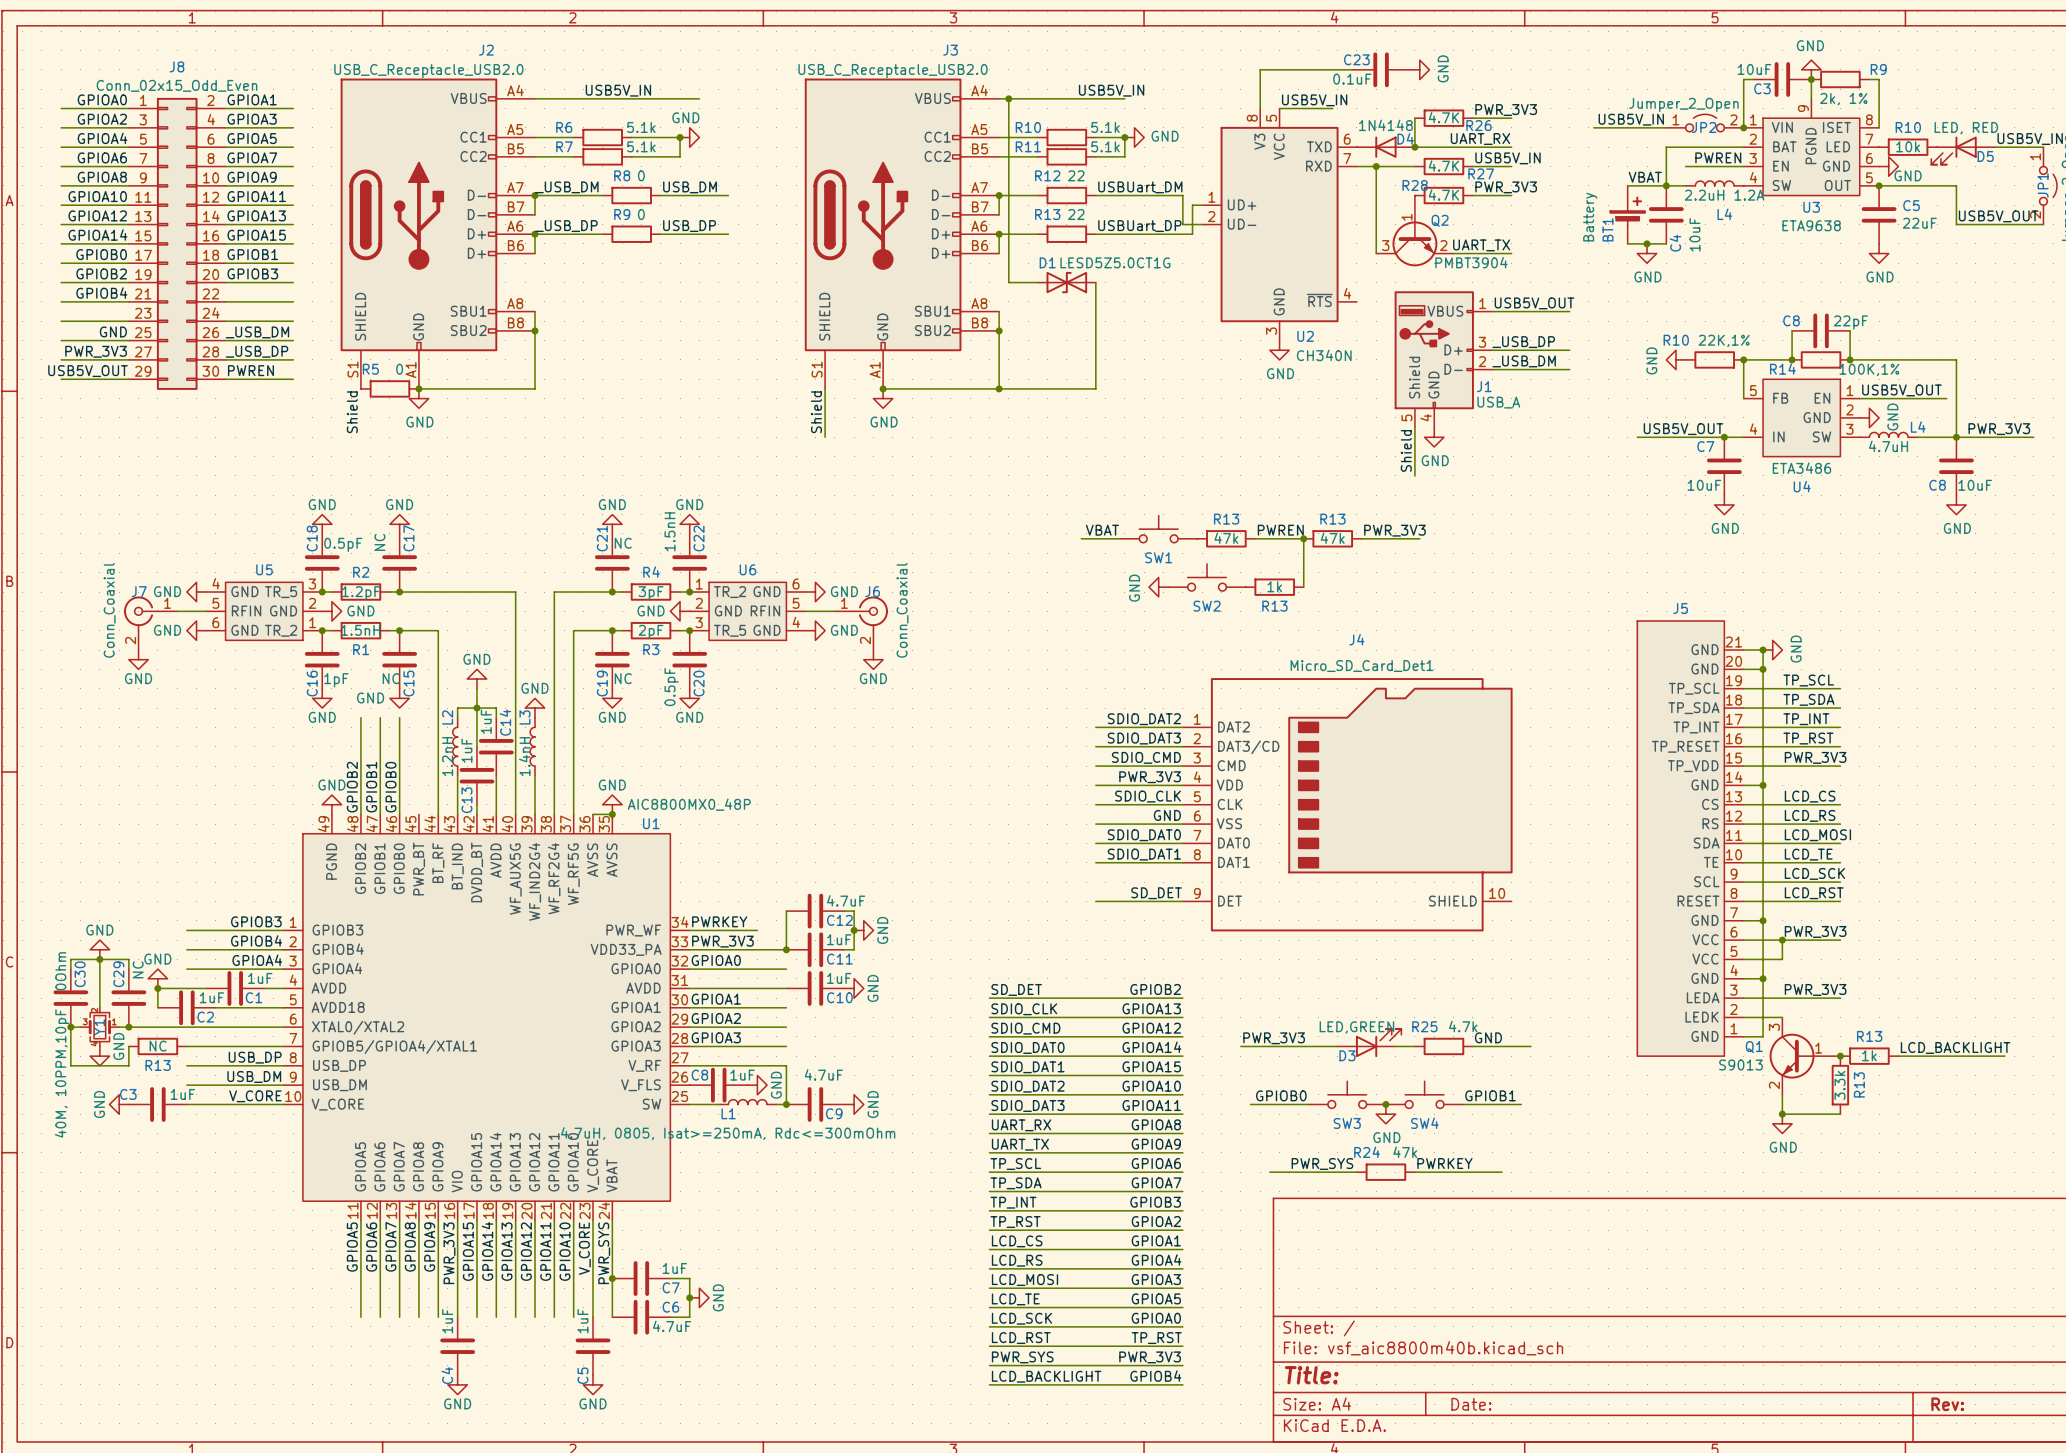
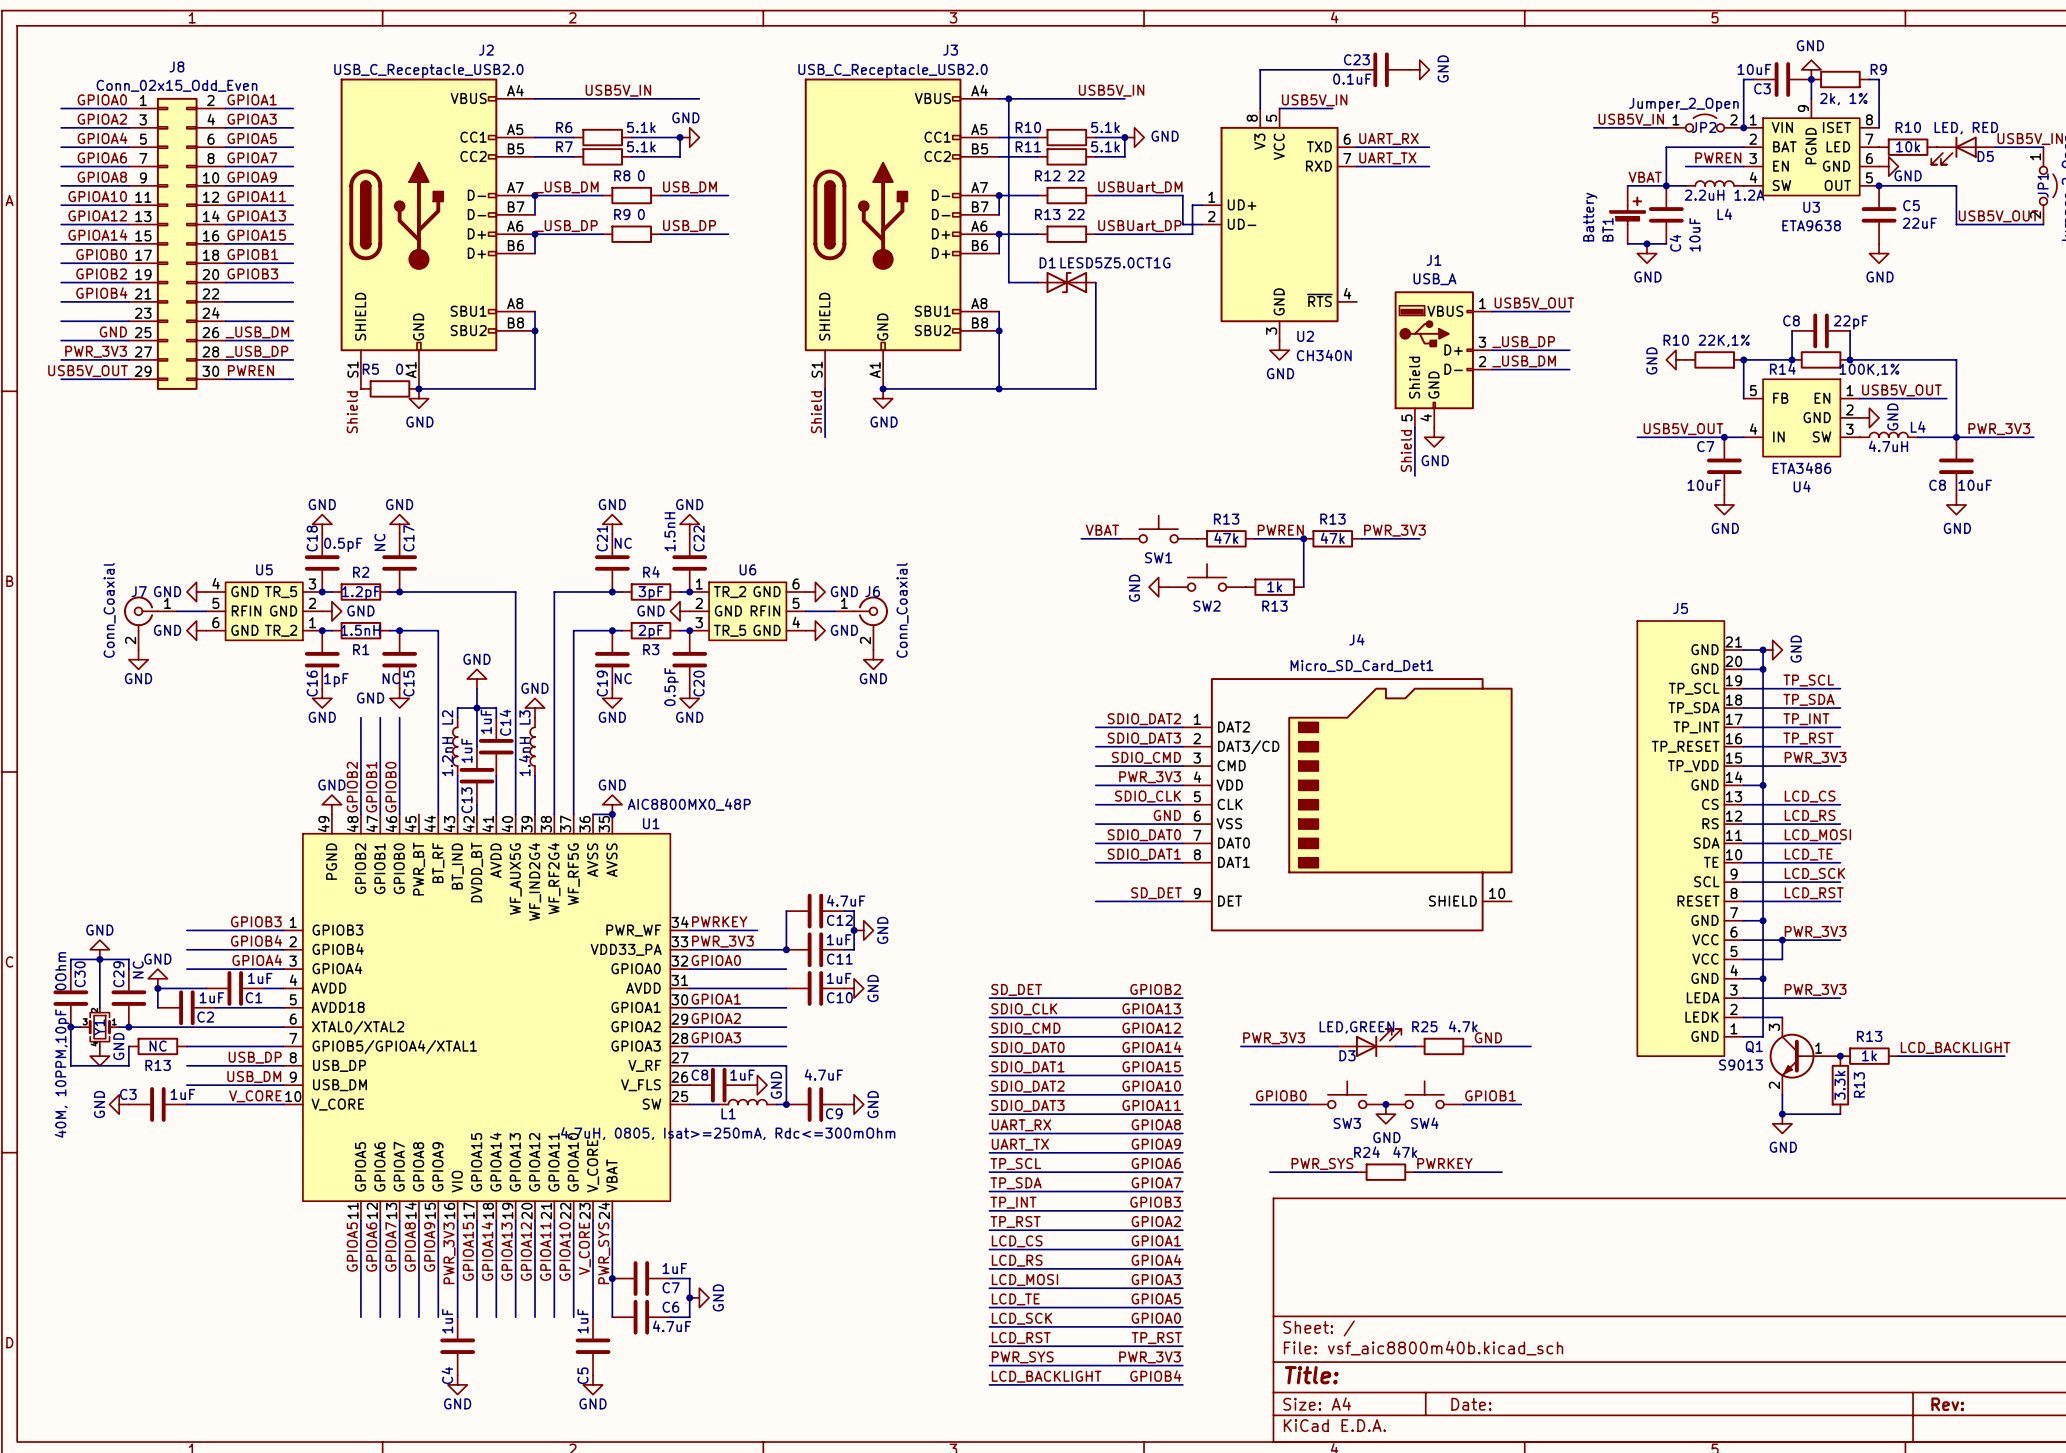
label: PWR_3V3 (1506, 110) -> none
R26: 4.7K (1443, 118) -> none
wire: (1472, 118) (1511, 118) -> none
label position: UART_RX (1480, 139) -> UART_RX (1388, 139)
D4: 1N4148 (1385, 147) -> none
junction: (1414, 147) -> none
wire: (1429, 147) (1511, 147) -> none
label: USB5V_IN (1508, 158) -> none
wire: (1376, 166) (1376, 253) -> none
junction: (1376, 166) -> none
R27: 4.7K (1443, 166) -> none
wire: (1472, 166) (1511, 166) -> none
label: PWR_3V3 (1506, 187) -> none
R28: 4.7K (1443, 195) -> none
wire: (1472, 195) (1511, 195) -> none
Q2: PMBT3904 (1414, 230) -> none
label position: UART_TX (1481, 245) -> UART_TX (1387, 158)
wire: (1453, 253) (1511, 253) -> none
J1 name position: J1 (1484, 386) -> J1 (1434, 260)
J1 value position: USB_A (1498, 402) -> USB_A (1434, 279)

